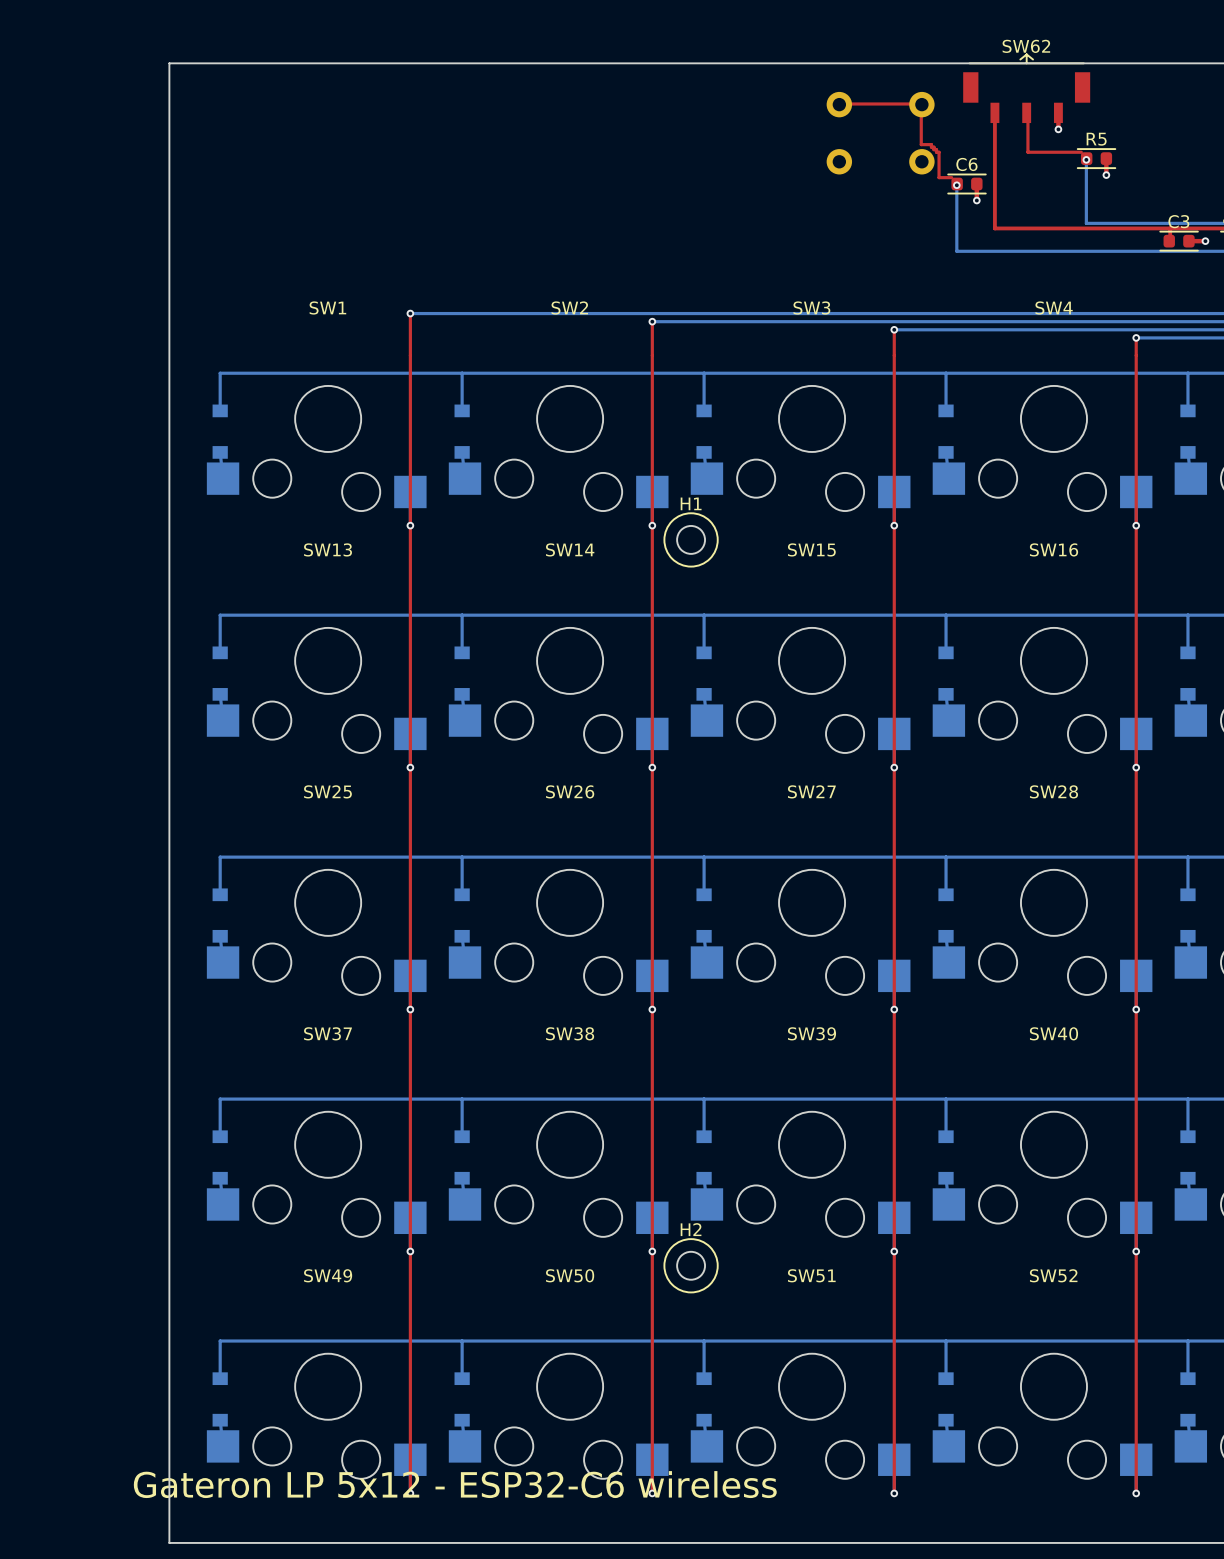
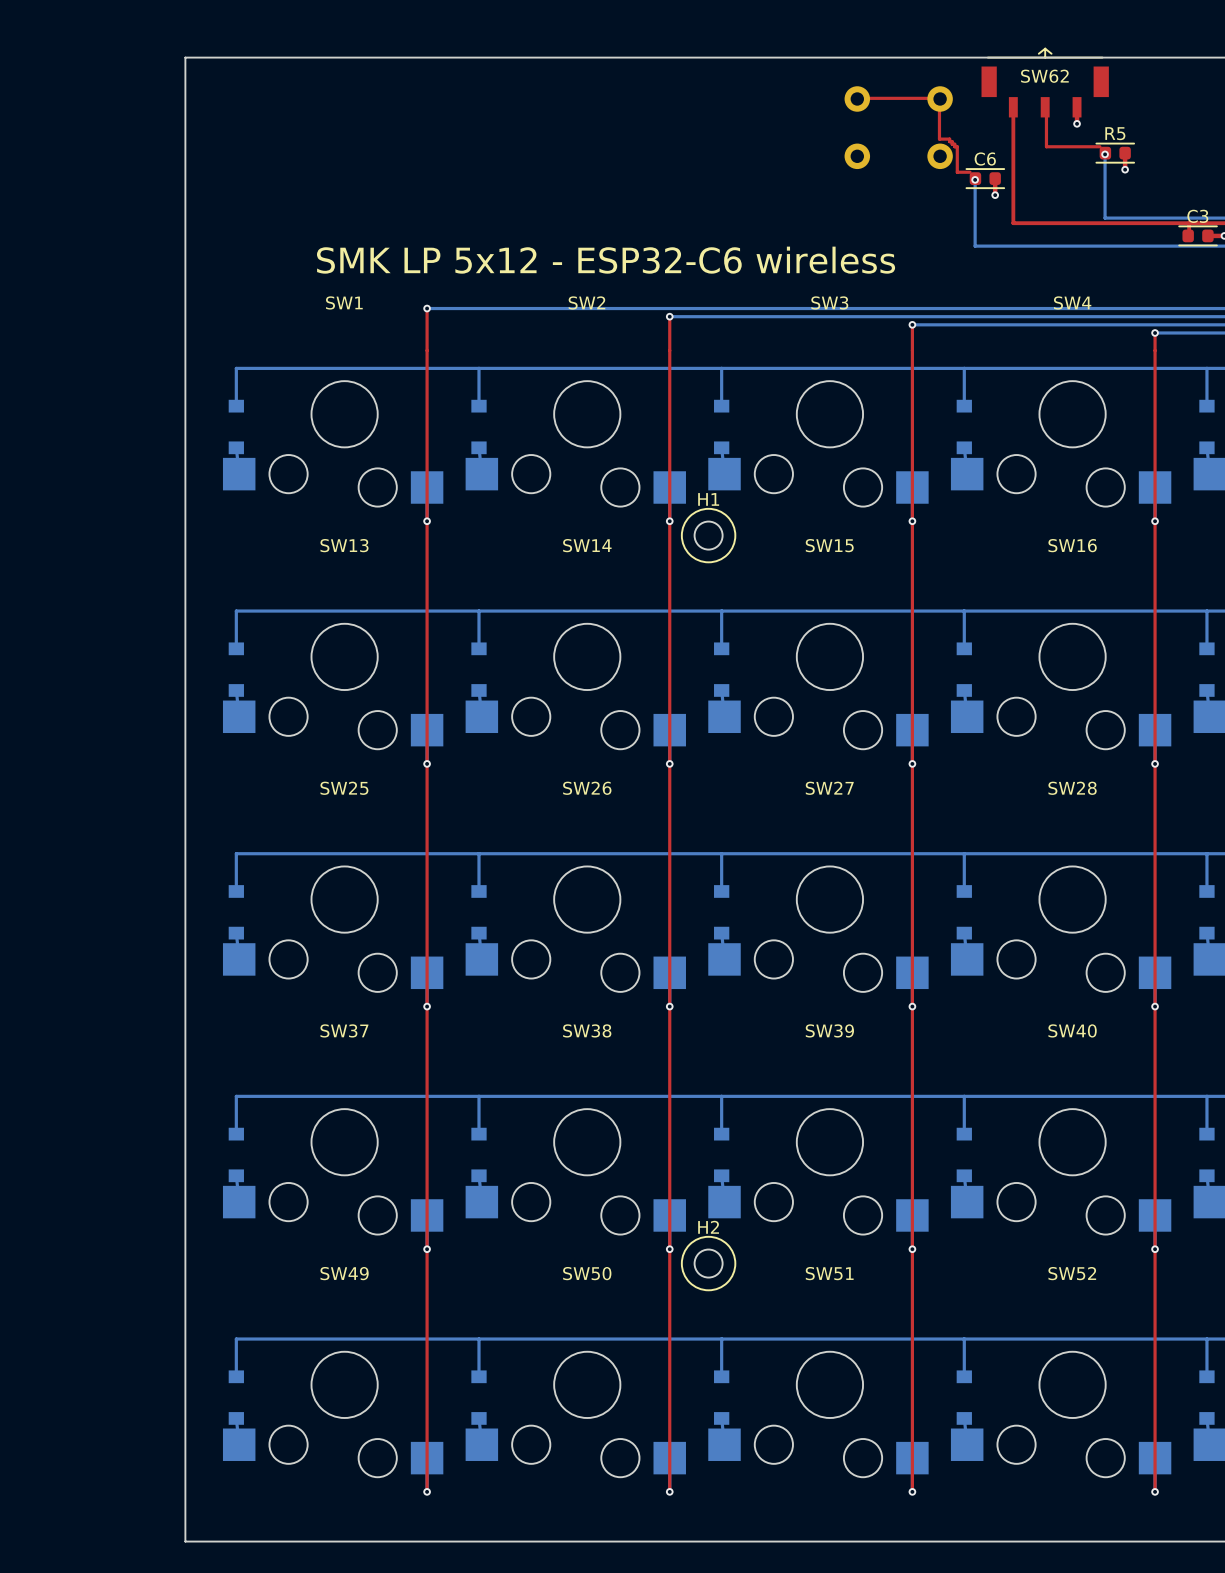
SW62 name position: SW62 (1026, 46) -> SW62 (1044, 76)
text: none -> SMK LP 5x12 - ESP32-C6 wireless (606, 260)
text: Gateron LP 5x12 - ESP32-C6 wireless (455, 1484) -> none

